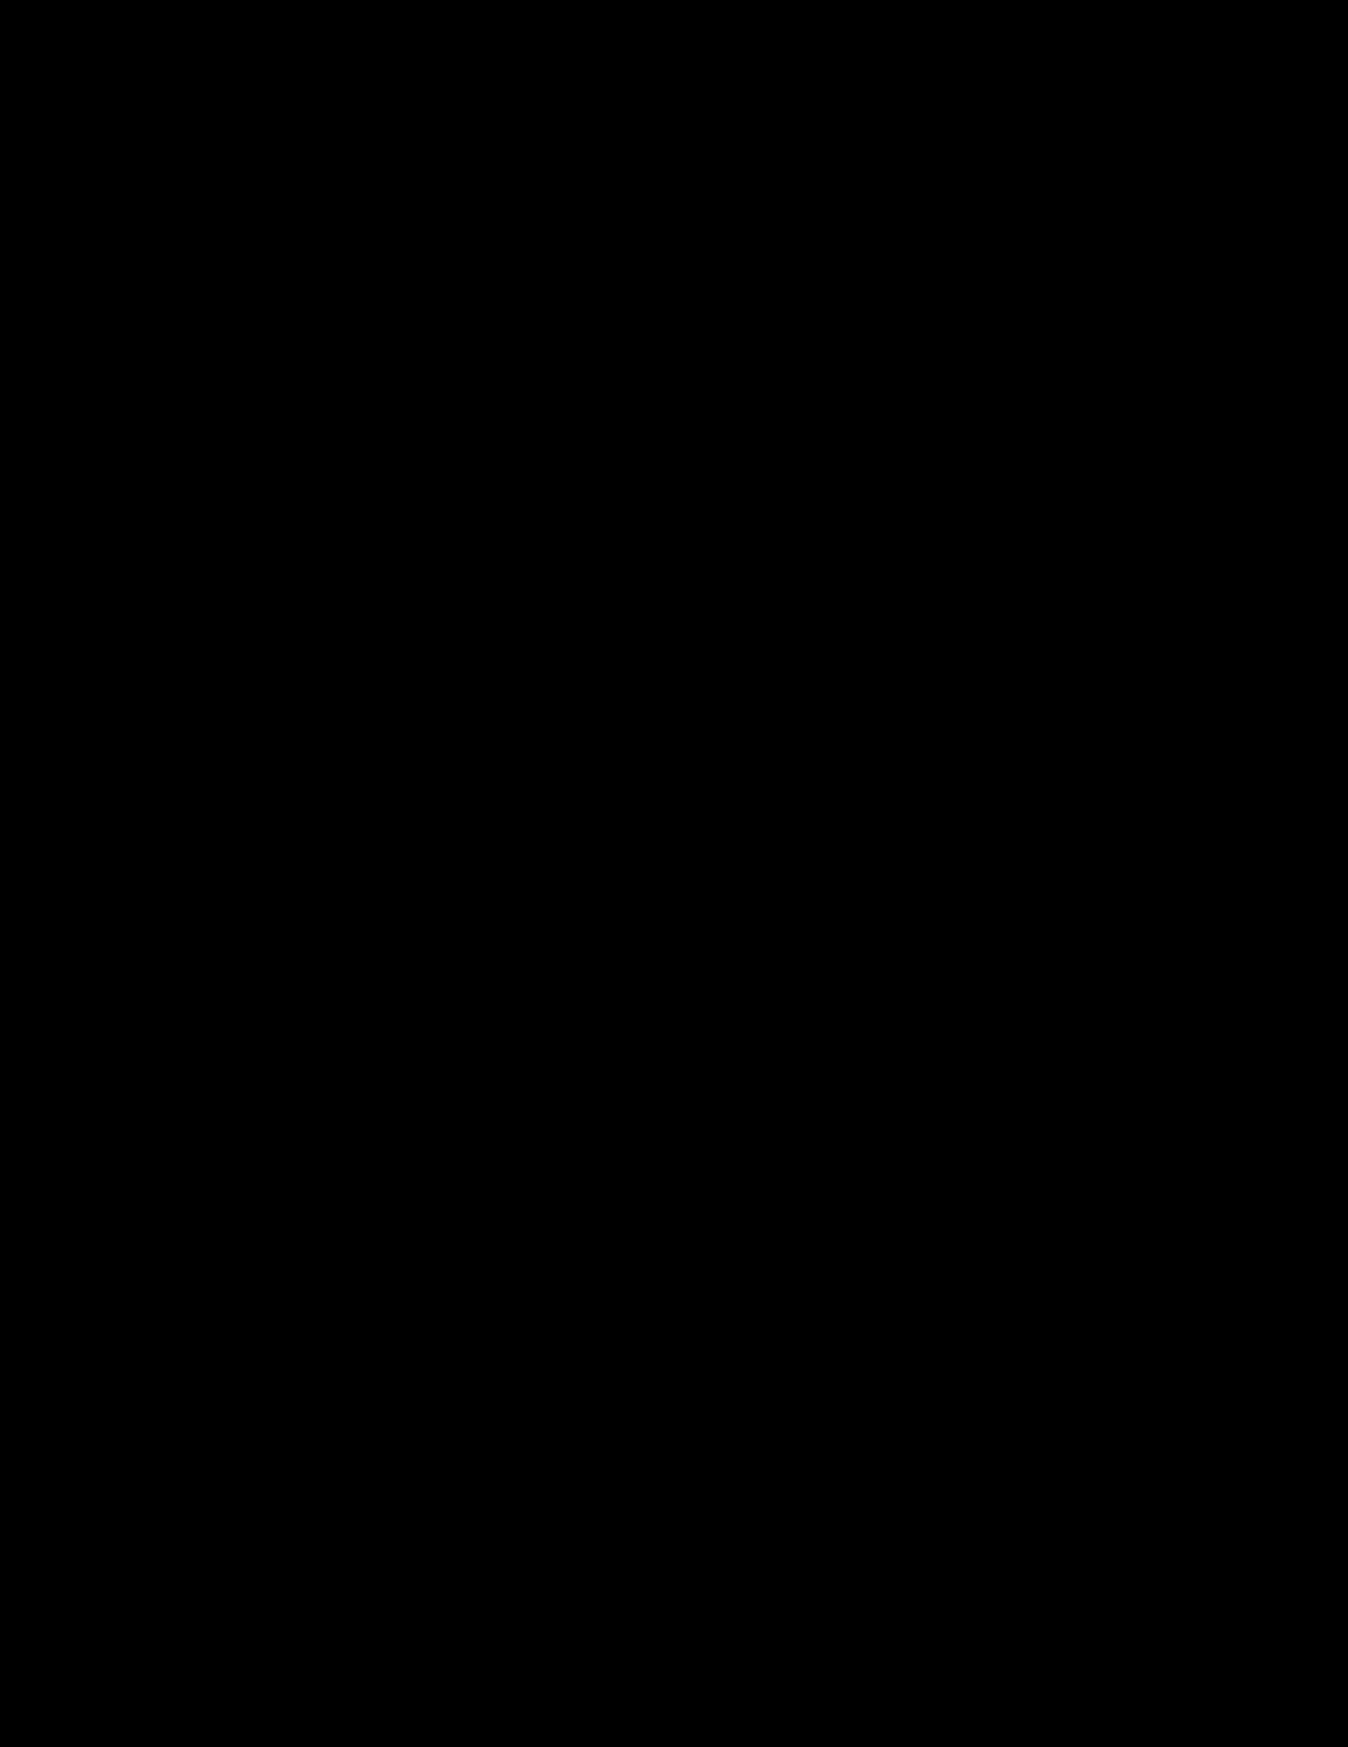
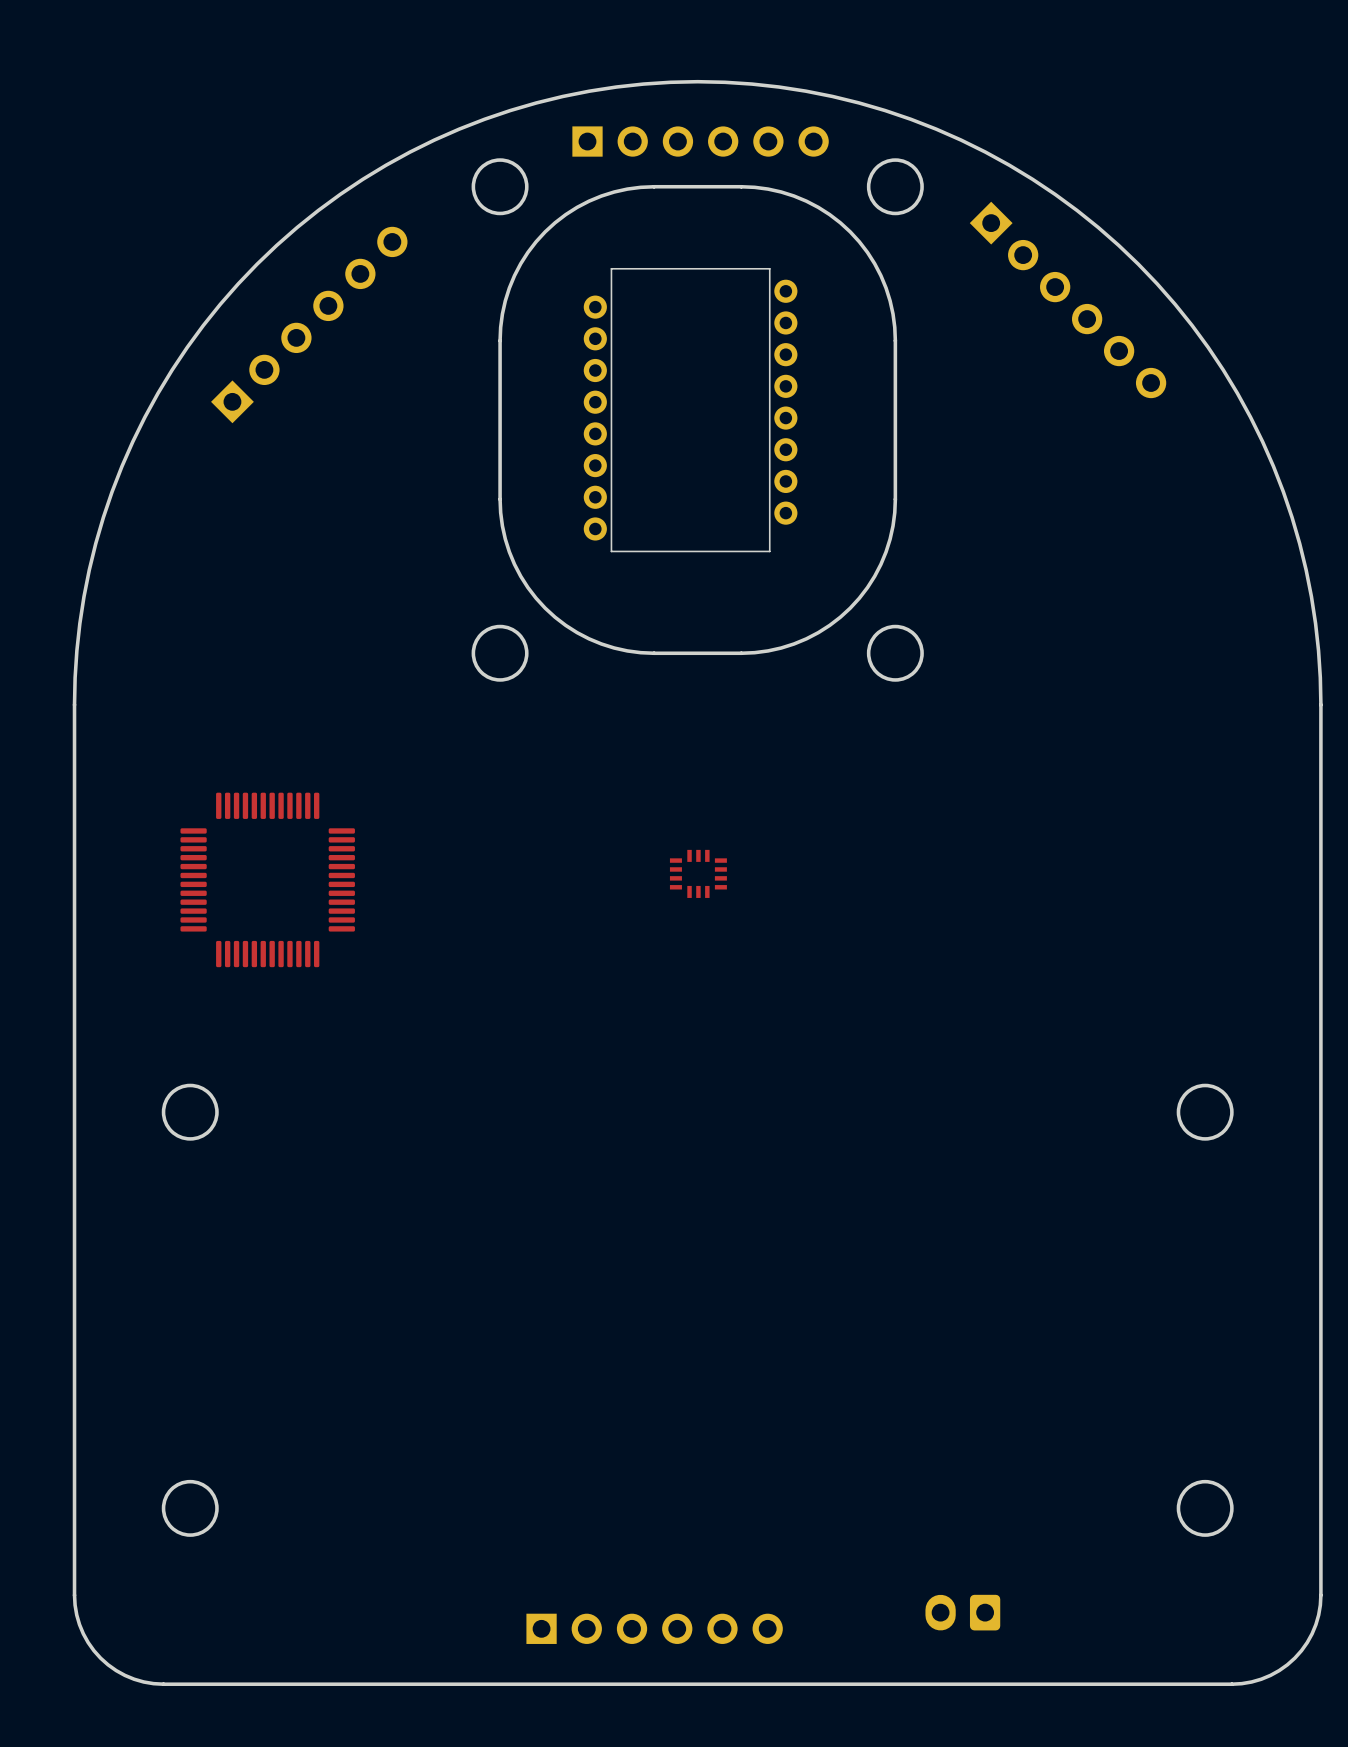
part: none -> (700, 141)
round board edge: none -> [471, 158, 529, 216]
round board edge: none -> [866, 158, 924, 216]
board edge: none -> (741, 186) (640, 187) (614, 192) (589, 201) (555, 222) (536, 241) (514, 275) (505, 300) (500, 340) (500, 499) (505, 539) (520, 576) (545, 608) (577, 632) (614, 648) (654, 653) (741, 653) (768, 650) (794, 643) (818, 632) (850, 608) (874, 576) (890, 539) (895, 499) (895, 340) (893, 314) (880, 275) (859, 241) (829, 214) (794, 196) (768, 189) (741, 186)
part: none -> (1068, 299)
part: none -> (309, 325)
part: none -> (690, 410)
round board edge: none -> [471, 624, 529, 682]
round board edge: none -> [866, 624, 924, 682]
board edge: none -> (1320, 704) (1320, 1595) (1318, 1614) (1312, 1633) (1301, 1650) (1287, 1664) (1261, 1679) (1231, 1684) (163, 1684) (143, 1681) (124, 1675) (108, 1664) (93, 1650) (79, 1624) (74, 1595) (74, 704) (76, 650) (83, 596) (95, 543) (112, 491) (132, 441) (172, 370) (203, 325) (238, 283) (276, 245) (318, 210) (386, 165) (434, 140) (484, 119) (562, 96) (643, 84) (724, 82) (779, 87) (832, 96) (910, 119) (985, 152) (1055, 194) (1118, 245) (1175, 304) (1223, 370) (1262, 441) (1292, 517) (1311, 596) (1318, 650) (1320, 704)
part: none -> (698, 873)
part: none -> (267, 879)
round board edge: none -> [161, 1083, 219, 1141]
round board edge: none -> [1176, 1083, 1234, 1141]
round board edge: none -> [161, 1479, 219, 1537]
round board edge: none -> [1176, 1479, 1234, 1537]
part: none -> (962, 1612)
part: none -> (654, 1628)

